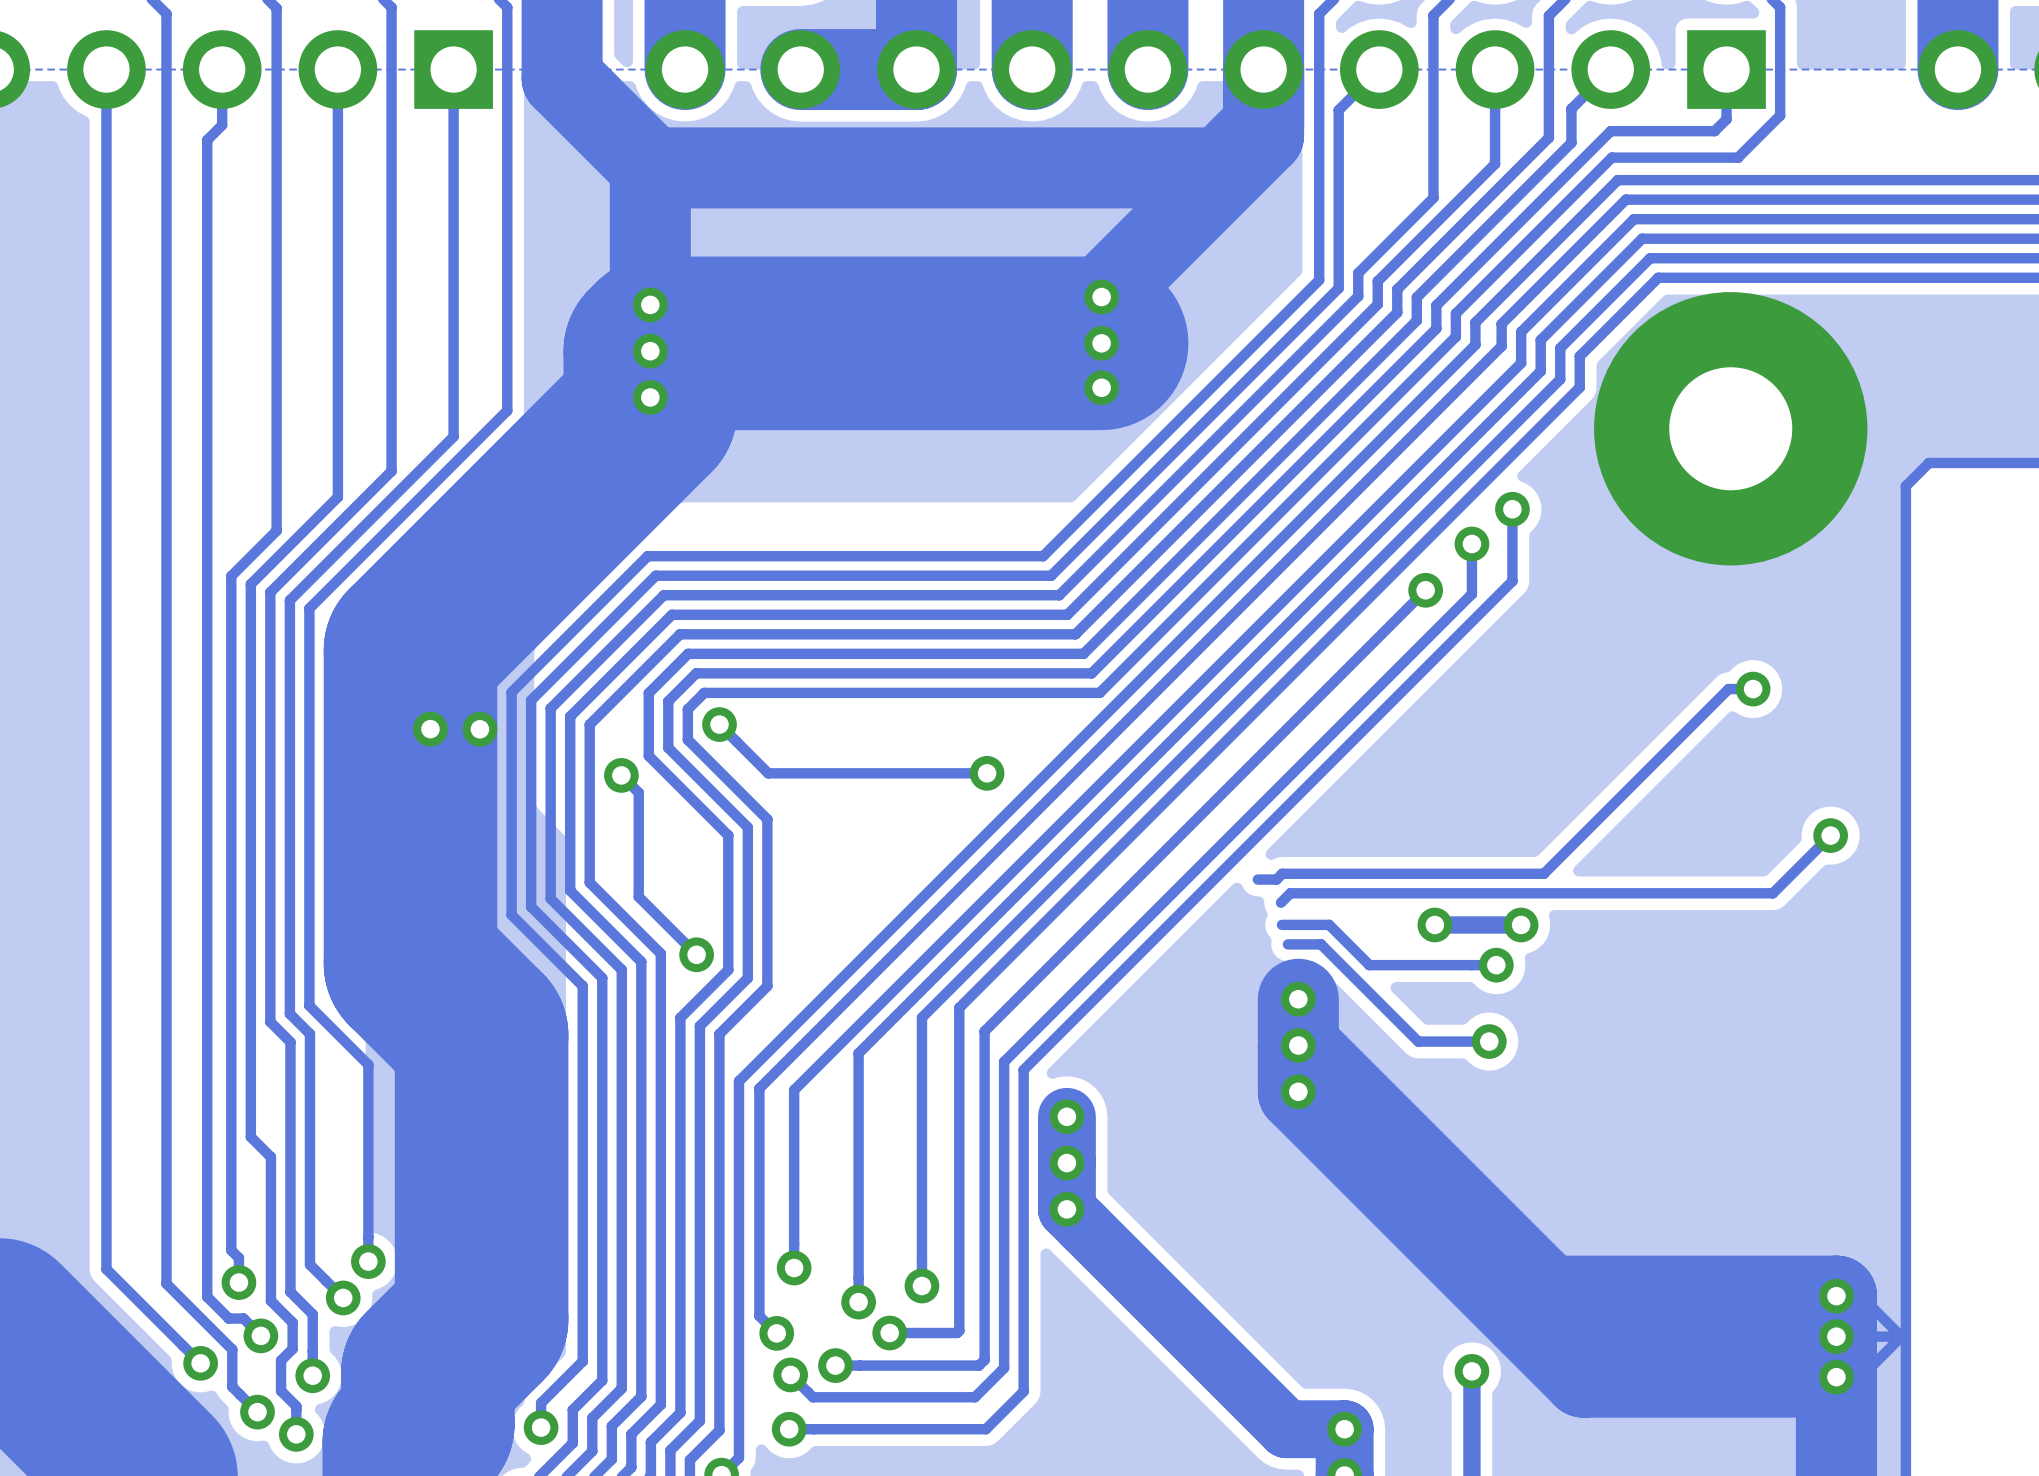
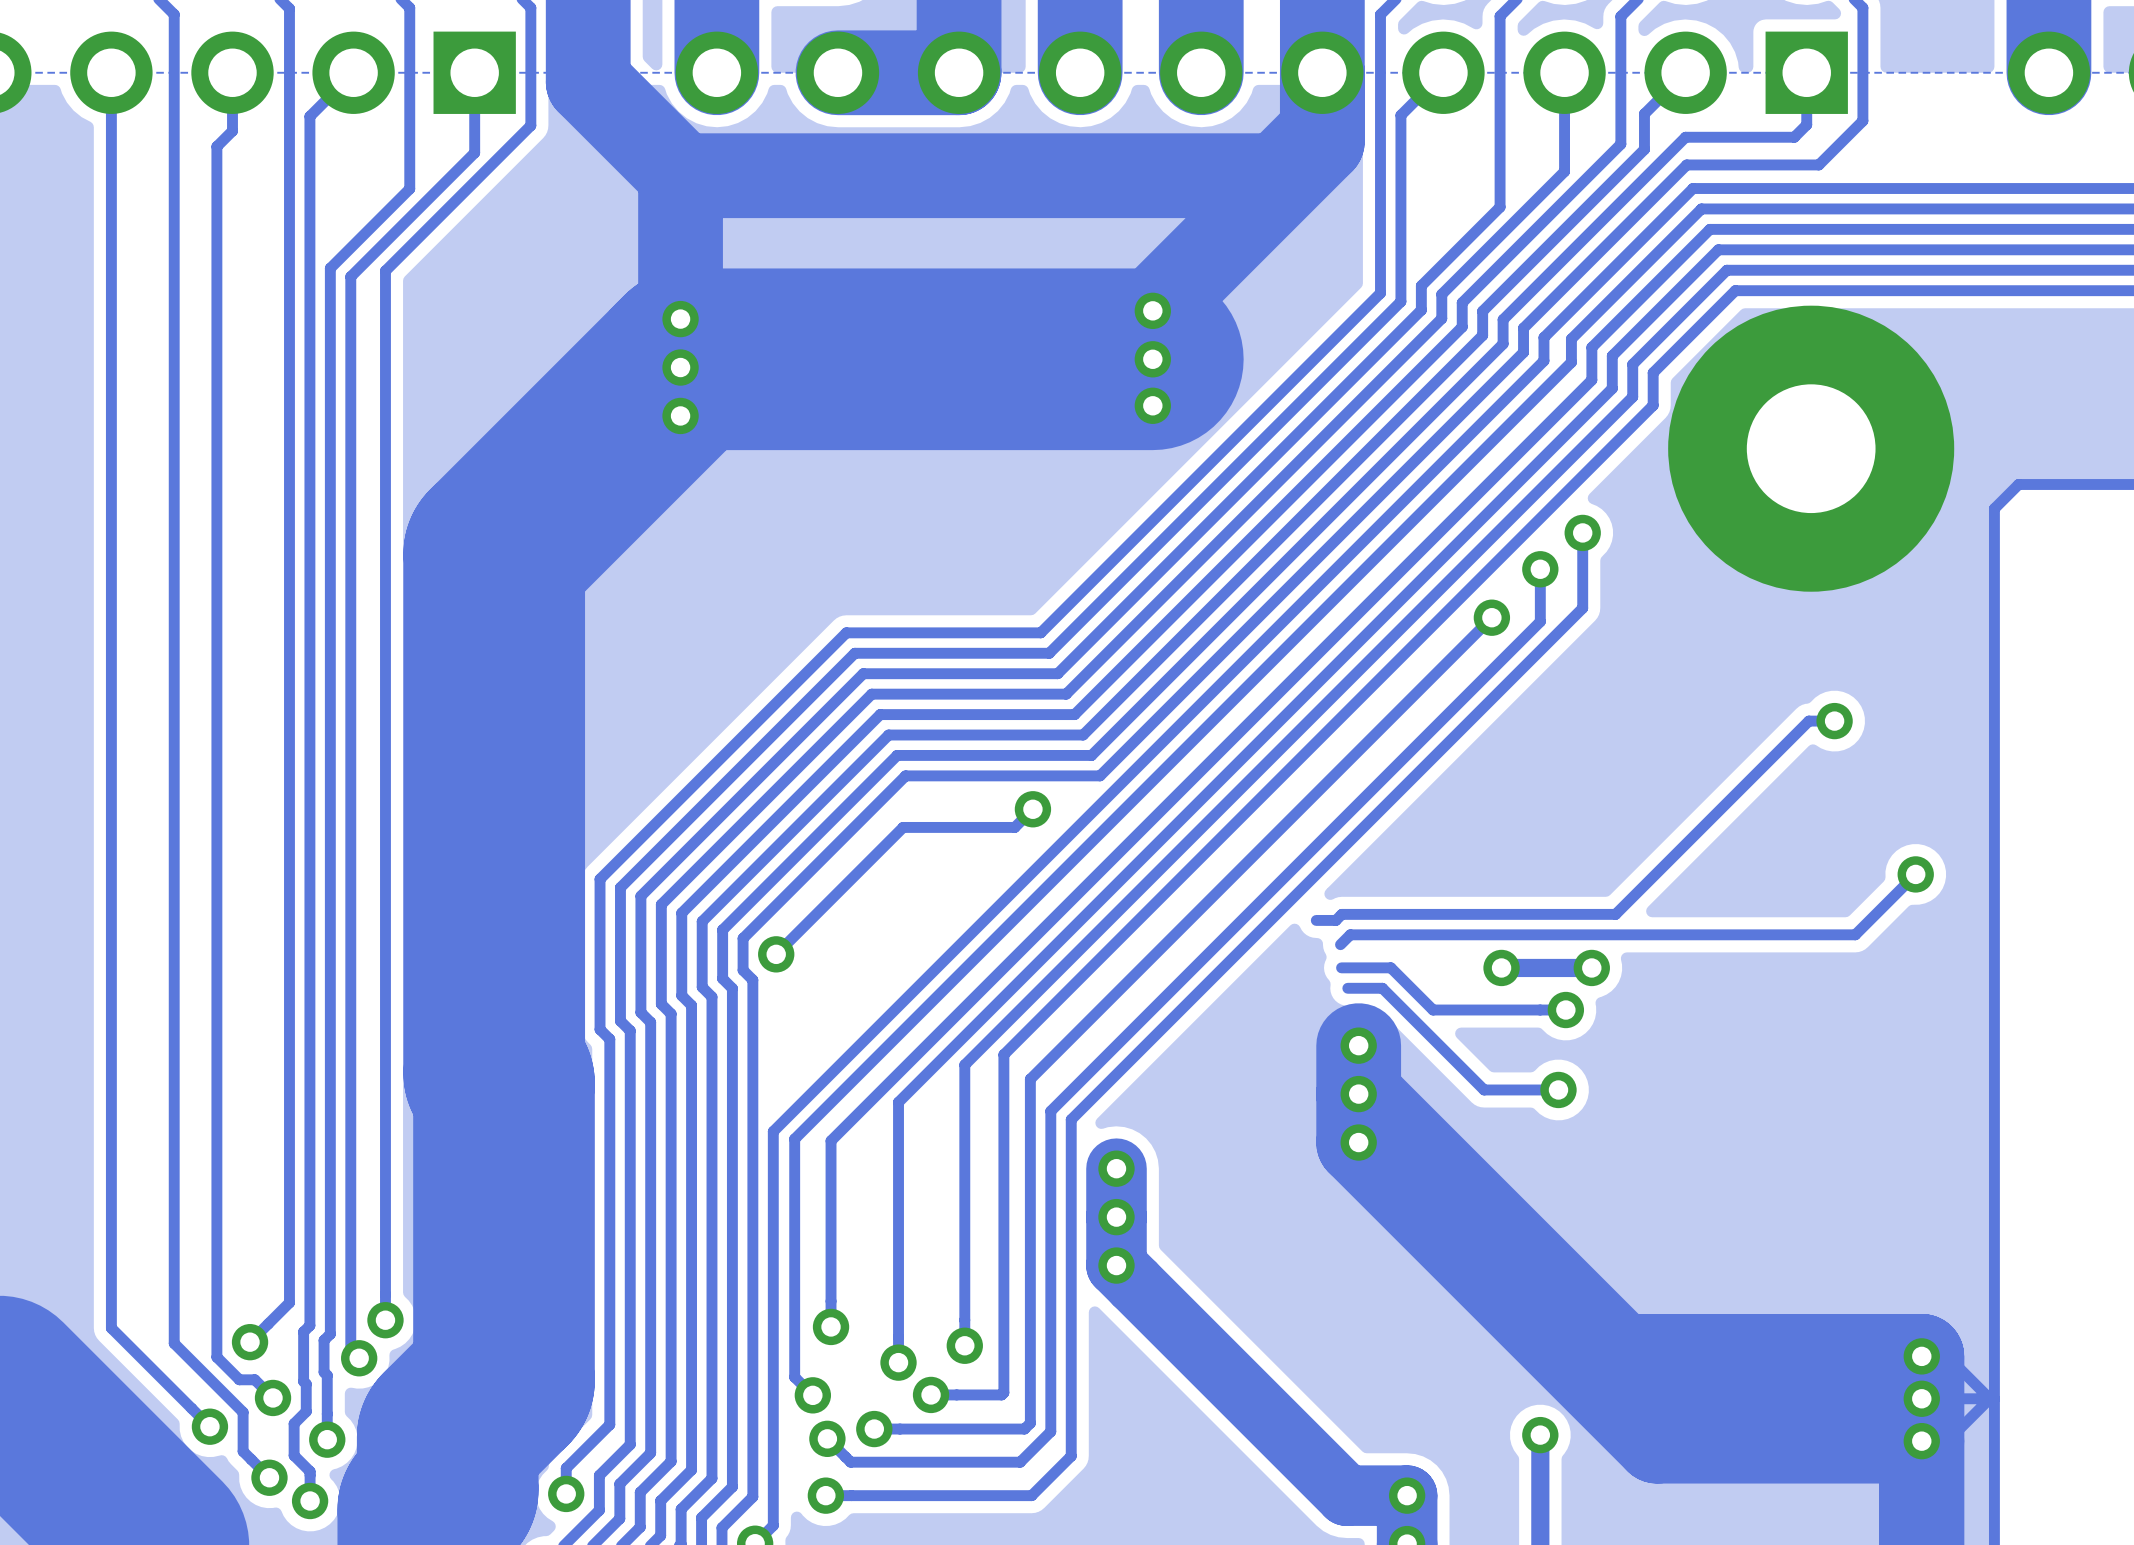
track: (337, 69) (337, 497) (250, 584) (250, 1137) (270, 1157) (270, 1300) (290, 1320) -> (353, 72) (309, 116) (309, 1325) (303, 1331) (303, 1381)
track: (507, 120) (507, 410) (309, 608) (309, 1005) (368, 1064) -> (530, 125) (385, 270) (385, 1114)
track: (453, 146) (453, 436) (289, 600) (289, 1013) (309, 1033) (309, 1264) (335, 1289) -> (474, 152) (350, 276) (350, 1349)
track: (391, 180) (391, 471) (270, 592) (270, 1021) (290, 1042) (290, 1292) (309, 1311) -> (409, 188) (330, 268) (330, 1334) (324, 1340) (324, 1372)
track: (650, 351) (650, 410) (410, 650) (410, 963) (472, 1025) -> (680, 367) (494, 553) (494, 1073)
track: (276, 530) (231, 576) (231, 1250) (238, 1258) (238, 1282) -> (289, 555) (289, 1302) (250, 1342)
track: (1043, 556) (647, 556) (511, 692) (511, 914) (582, 986) (582, 993) -> (1091, 582) (1040, 632) (846, 632) (600, 879) (600, 1029) (609, 1039)
track: (1051, 575) (655, 575) (531, 700) (531, 906) (602, 977) (602, 985) -> (1100, 602) (1049, 653) (854, 653) (620, 887) (620, 1021) (630, 1030)
track: (1059, 595) (663, 595) (550, 708) (550, 898) (621, 969) (621, 976) -> (1108, 622) (1057, 673) (863, 673) (640, 896) (640, 1012) (650, 1022)
track: (1067, 614) (671, 614) (570, 716) (570, 890) (641, 961) (641, 968) -> (1116, 643) (1066, 694) (871, 694) (661, 904) (661, 1004) (671, 1013)
track: (1075, 634) (680, 634) (589, 724) (589, 882) (660, 953) (660, 960) -> (1125, 663) (1074, 714) (880, 714) (681, 913) (681, 995) (691, 1005)
track: (1083, 653) (688, 653) (648, 693) (648, 755) (728, 835) (728, 969) (680, 1017) -> (1133, 684) (1083, 735) (888, 735) (702, 921) (702, 987) (711, 996) (711, 1065)
track: (1091, 673) (696, 673) (668, 701) (668, 747) (747, 827) (747, 978) (699, 1026) -> (1142, 704) (1091, 755) (897, 755) (722, 929) (722, 978) (732, 988) (732, 1073)
track: (1099, 692) (704, 692) (687, 709) (687, 739) (767, 819) (767, 986) (719, 1034) -> (1150, 725) (1100, 775) (905, 775) (743, 938) (743, 970) (752, 980) (752, 1082)
track: (719, 724) (768, 773) (987, 773) -> (776, 954) (903, 827) (1014, 827) (1032, 809)
via: (719, 724) -> none
via: (430, 729) -> none
via: (479, 729) -> none
track: (621, 775) (638, 792) (638, 896) (696, 954) -> none
via: (621, 775) -> none
via position: (696, 954) -> (776, 954)

